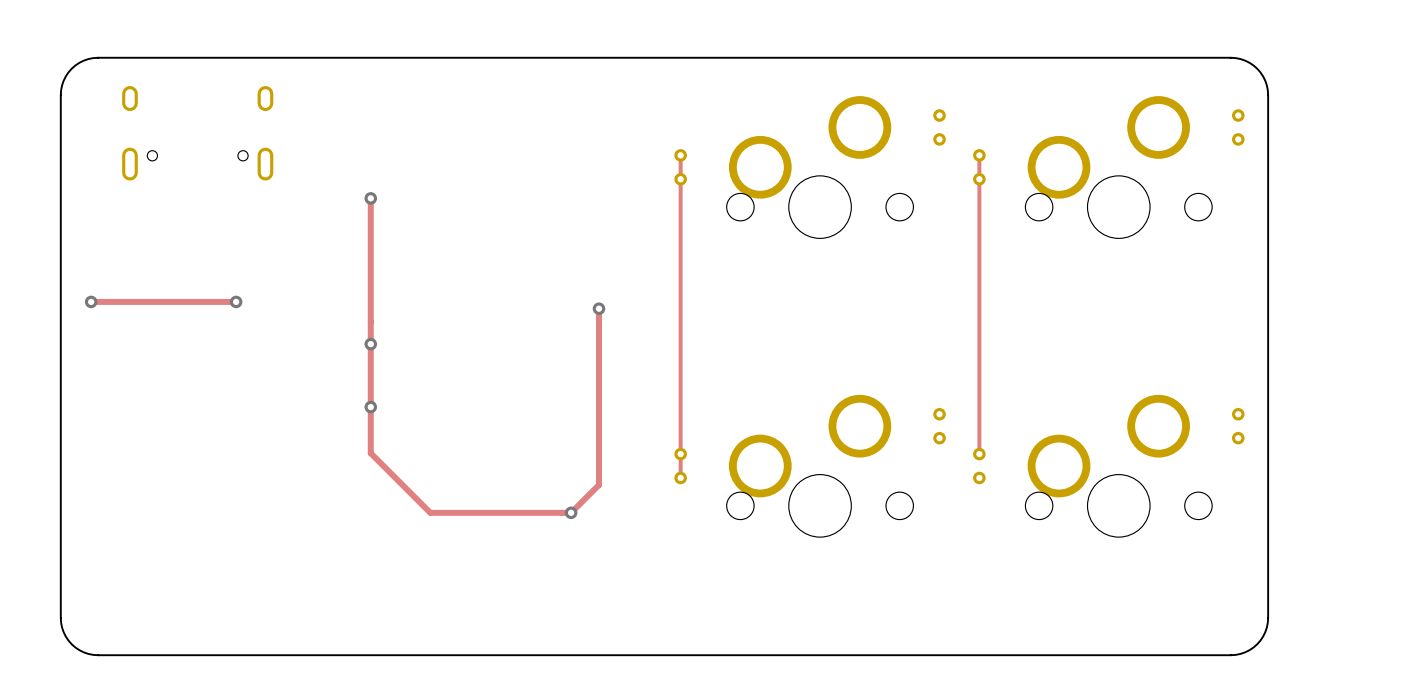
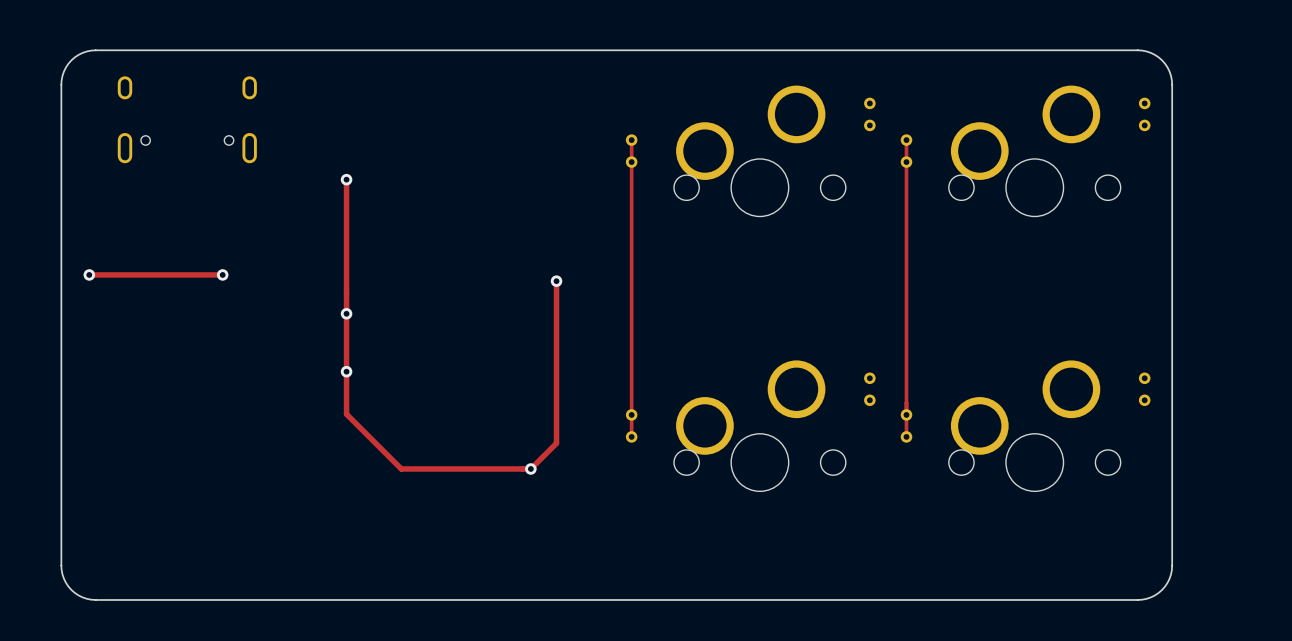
track: none -> (906, 414) (906, 436)

